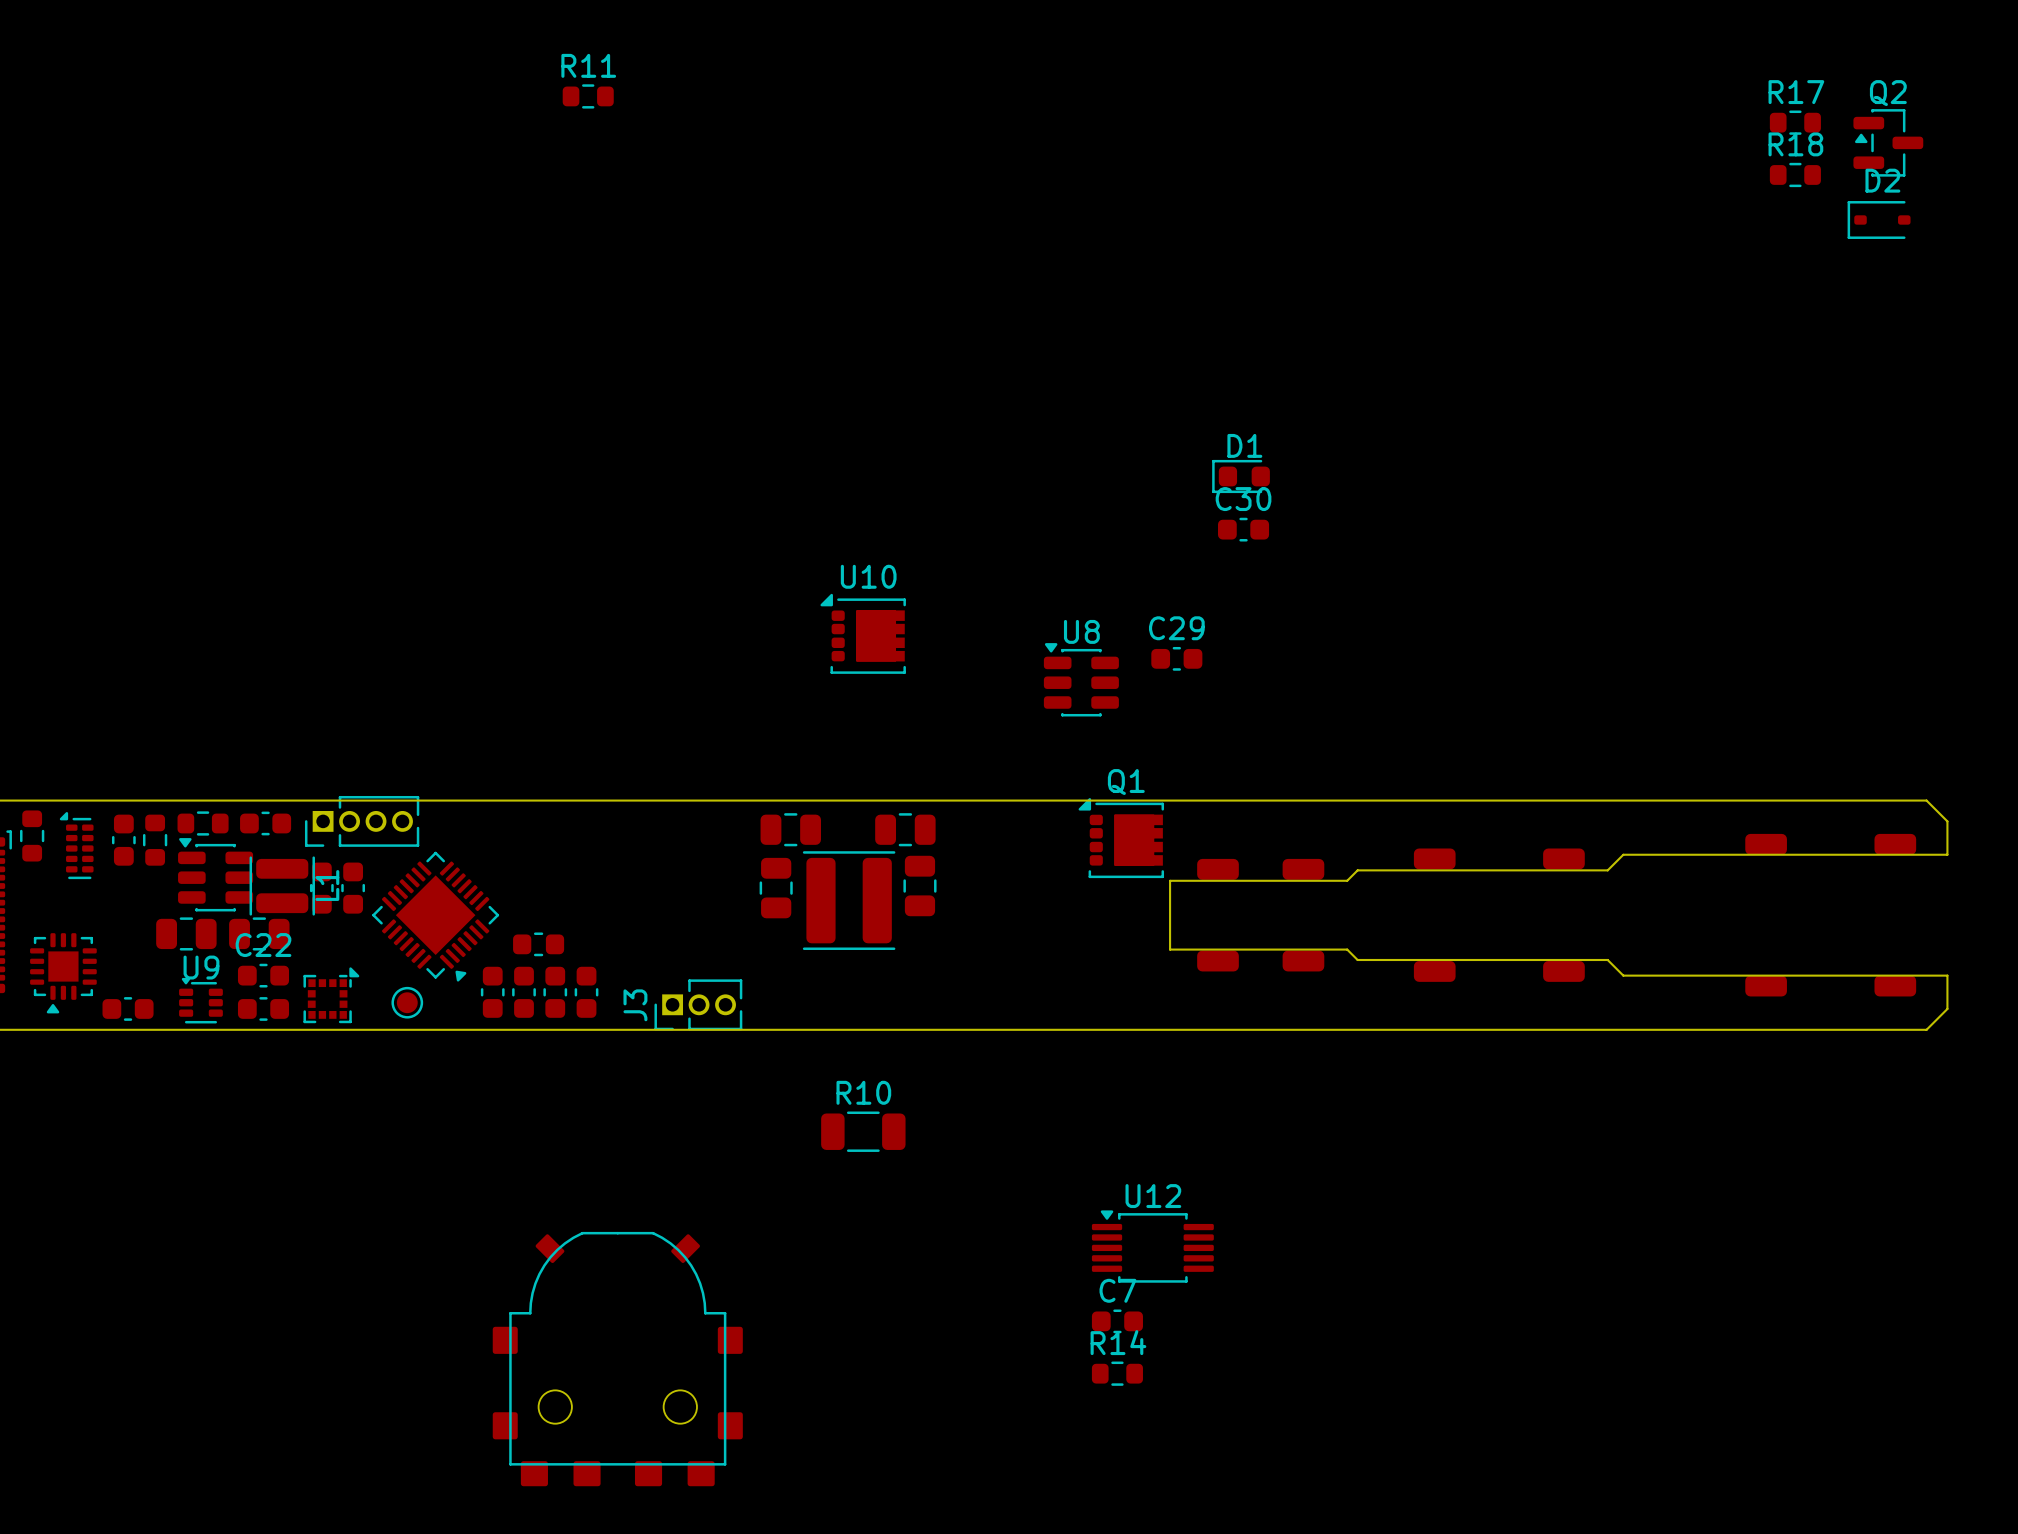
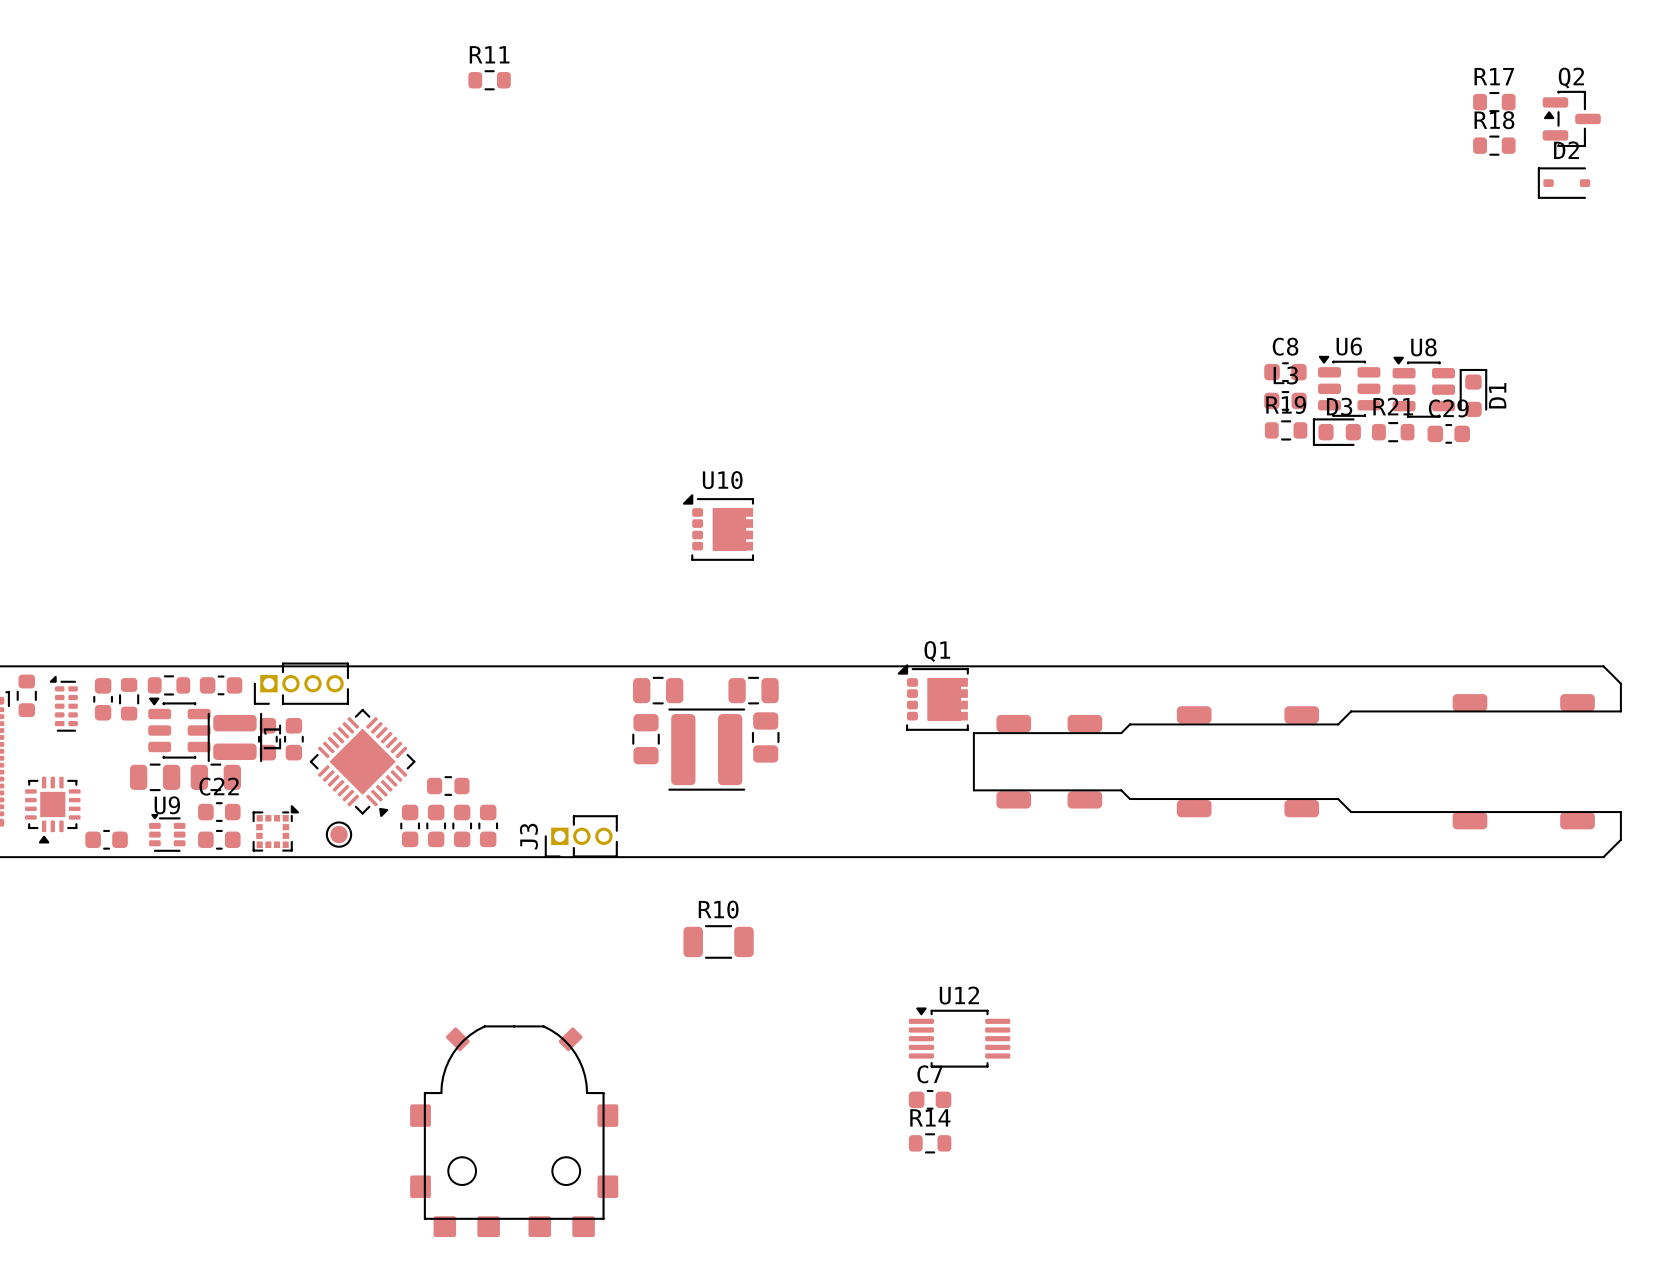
C8: none -> (1285, 372)
U6: none -> (1349, 386)
D1 rotation: 0° (1241, 476) -> 90° clockwise (1473, 392)
D1 position: (1241, 476) -> (1473, 392)
L3: none -> (1285, 400)
R19: none -> (1286, 430)
D3: none -> (1336, 432)
R21: none -> (1393, 432)
C30: (1243, 529) -> none
C29 position: (1176, 658) -> (1448, 433)
U8 position: (1081, 679) -> (1423, 387)

